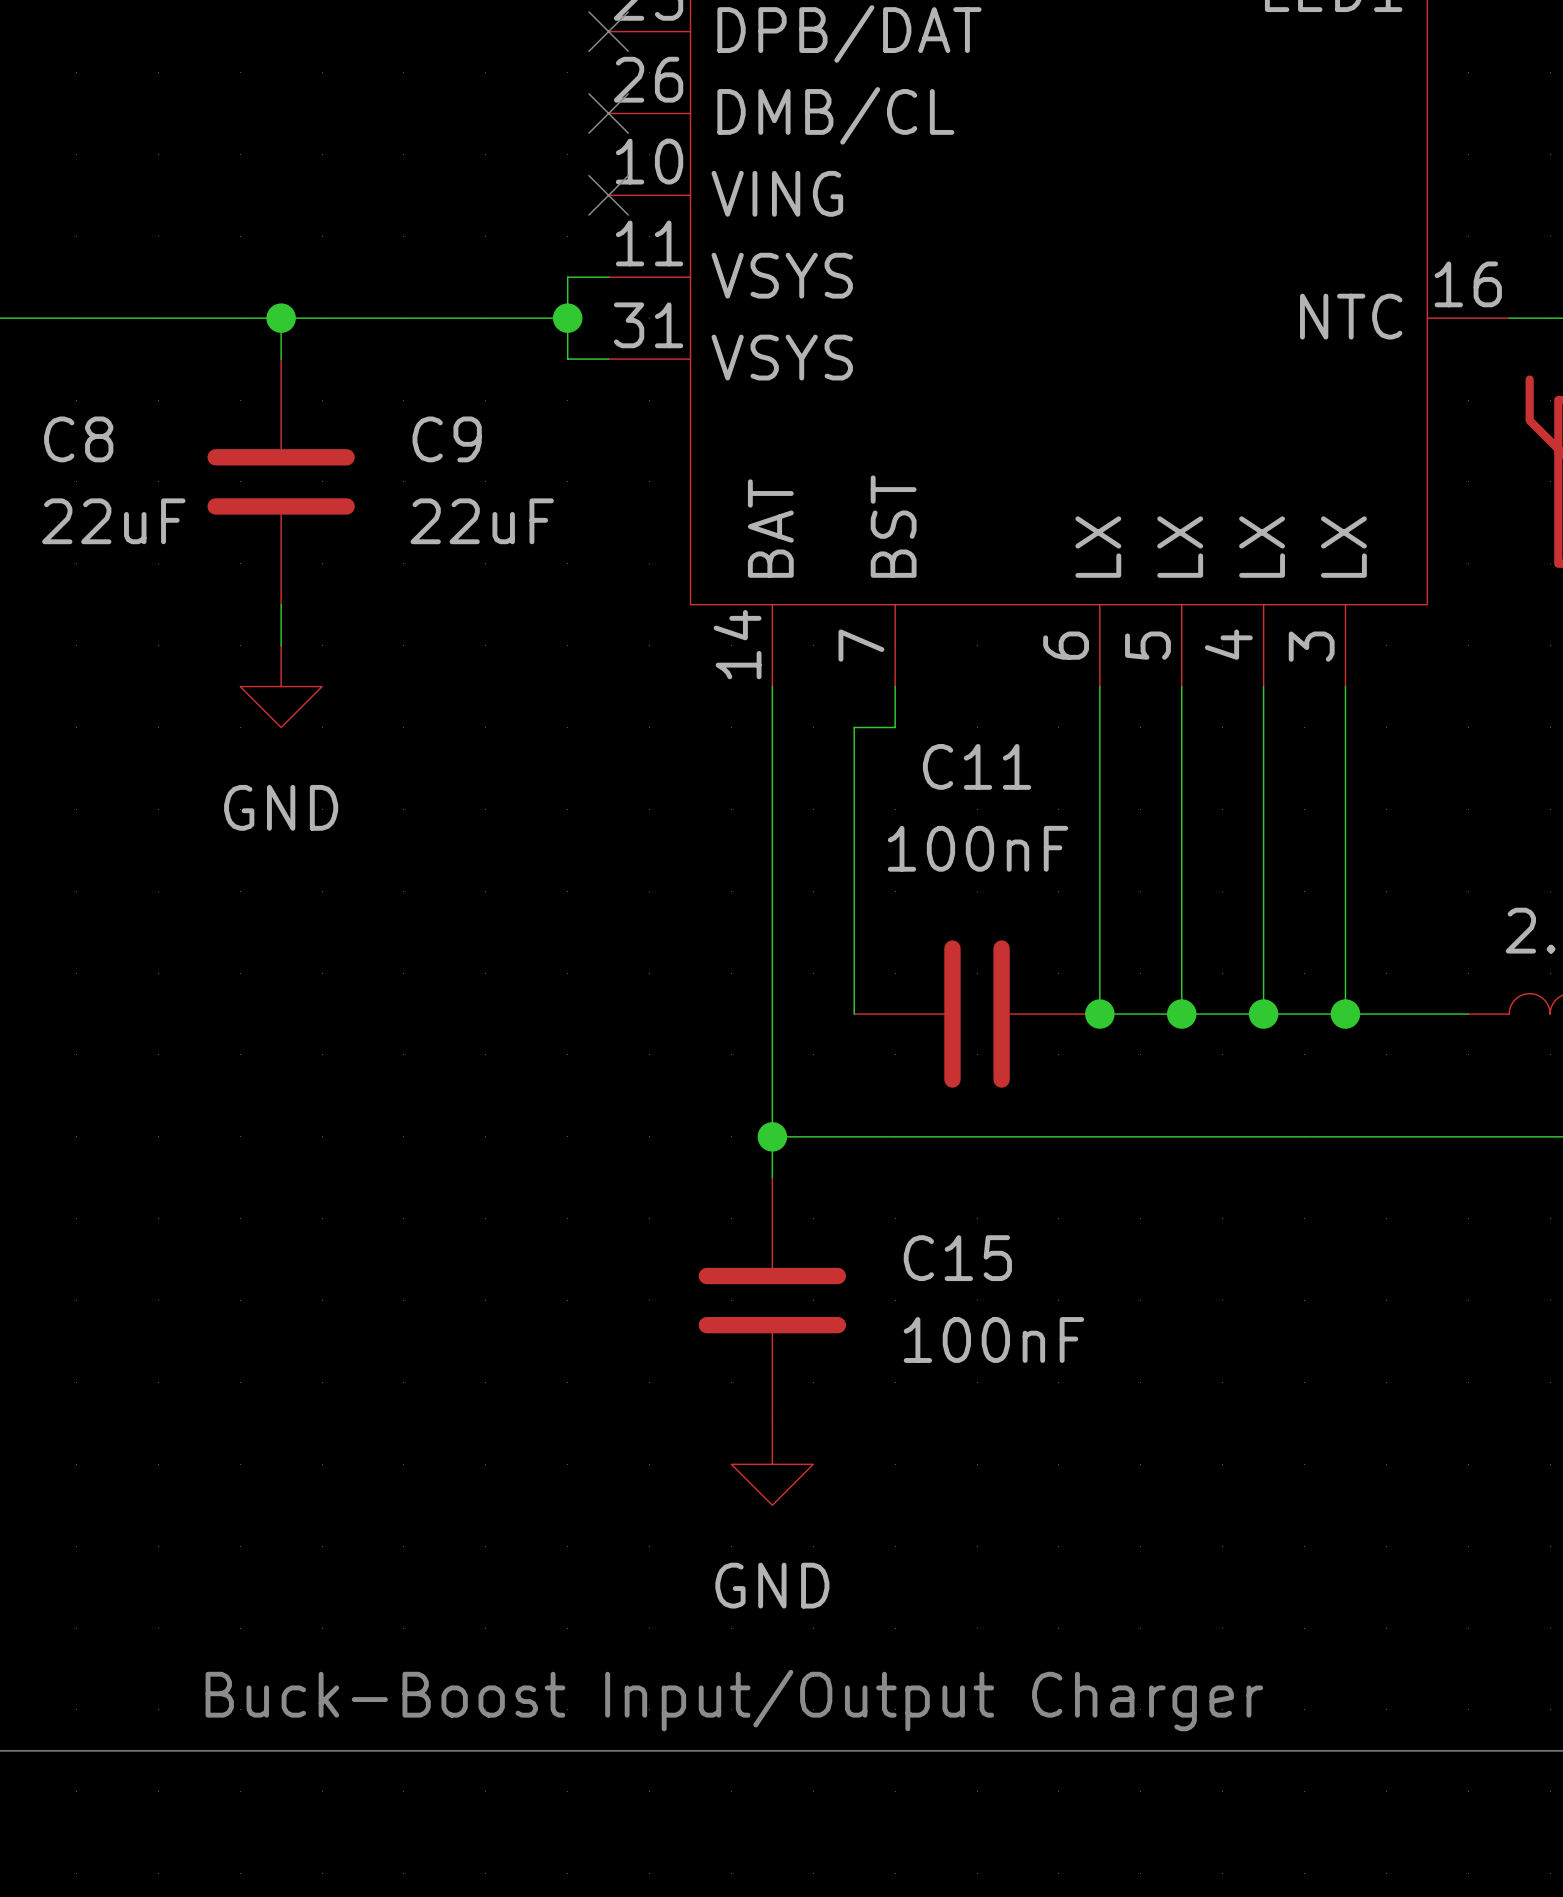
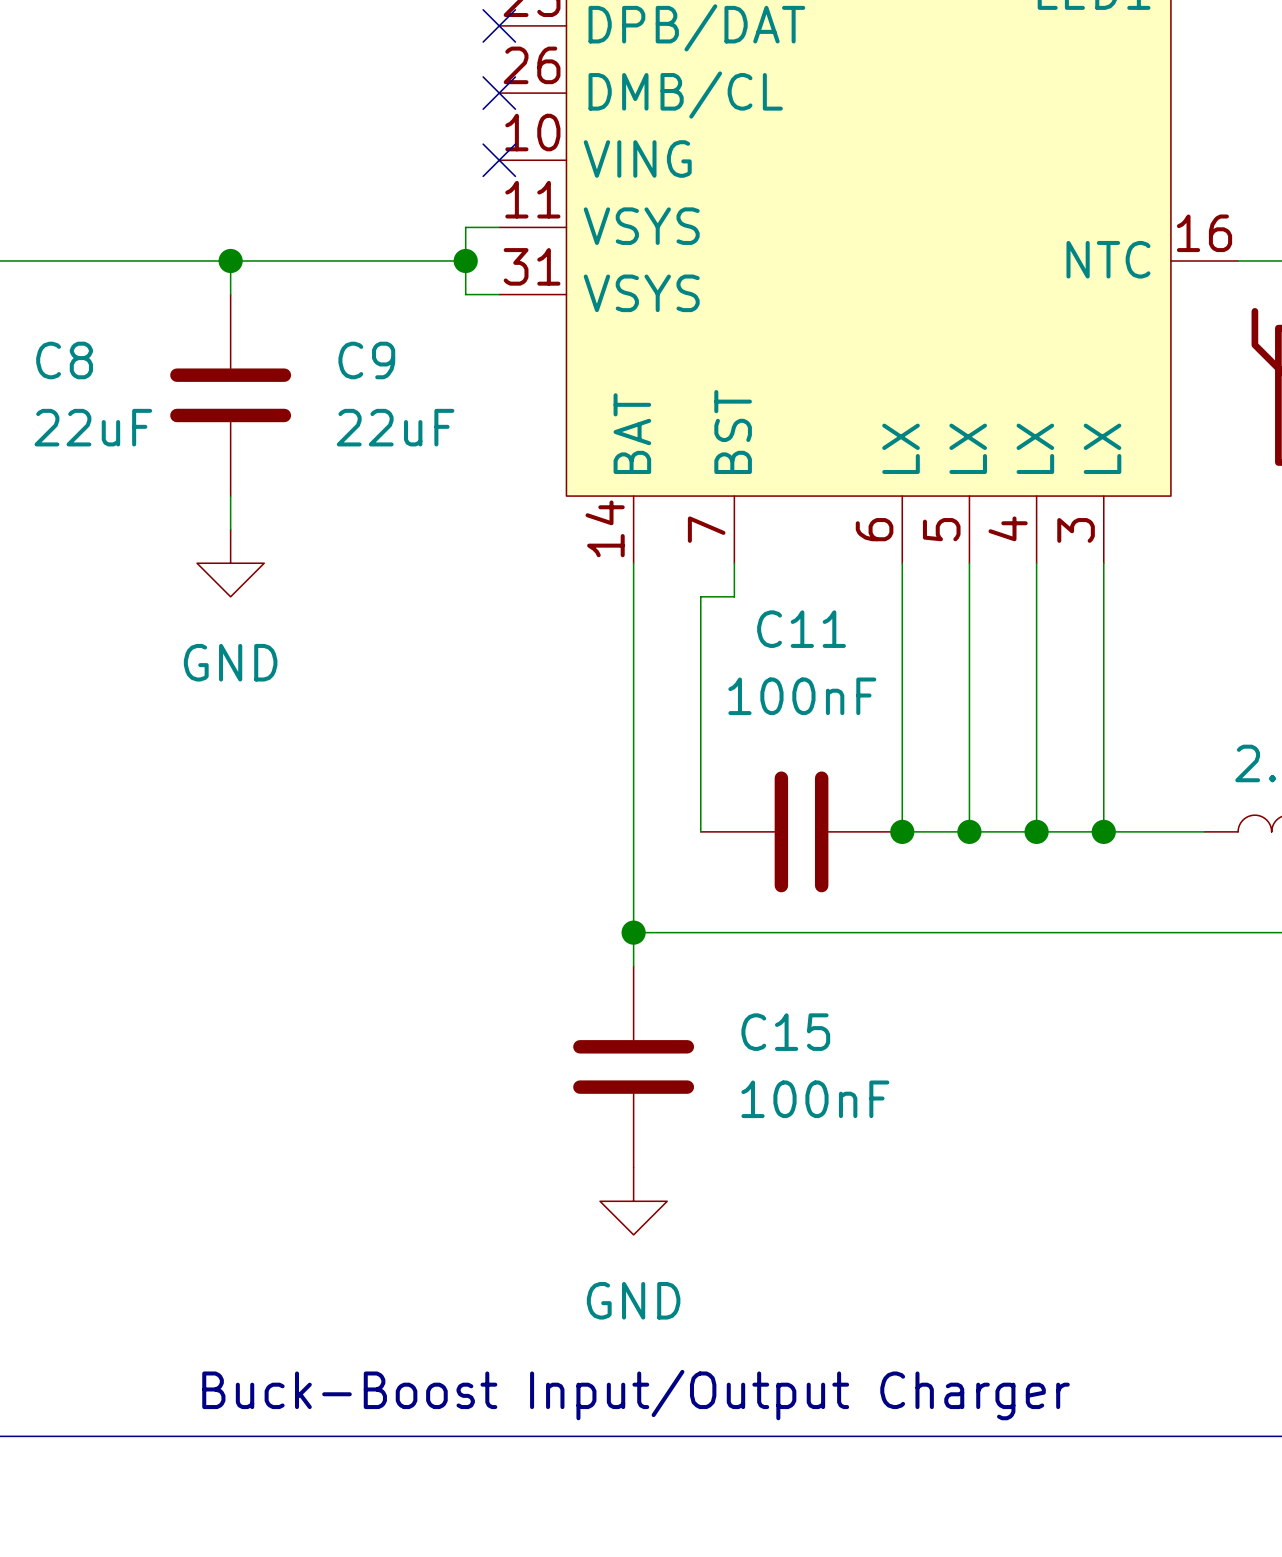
text position: Buck-Boost Input/Output Charger (734, 1700) -> Buck-Boost Input/Output Charger (636, 1395)

